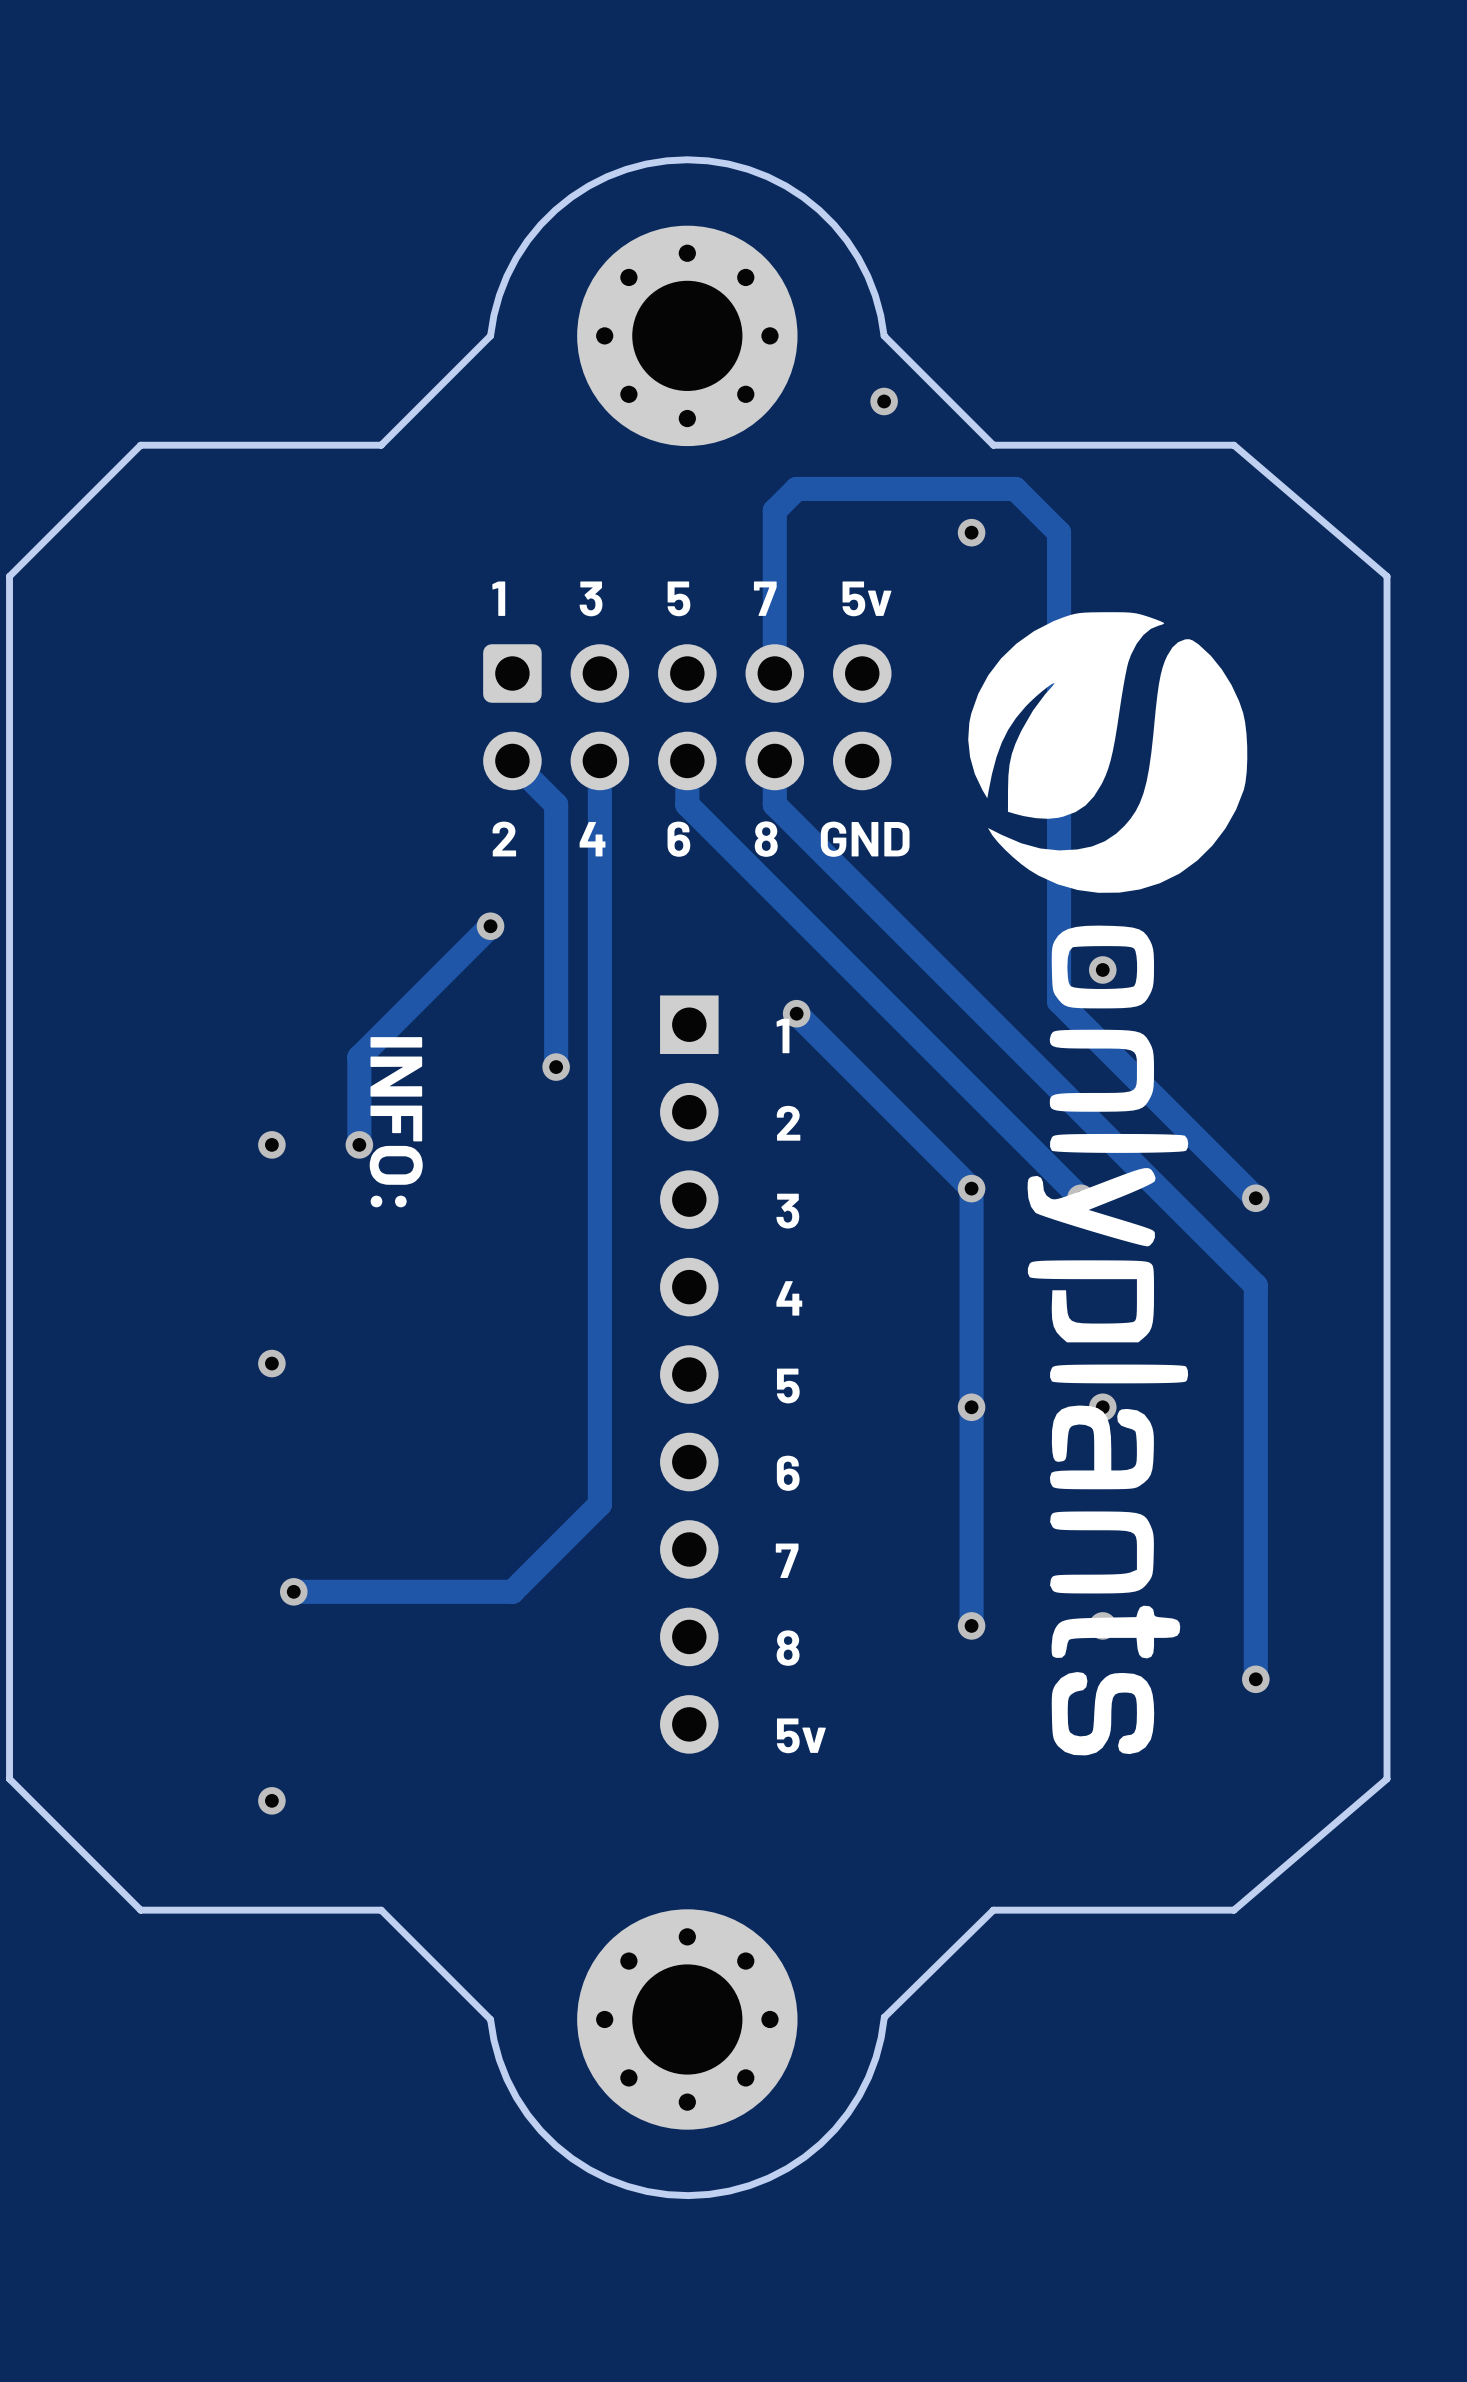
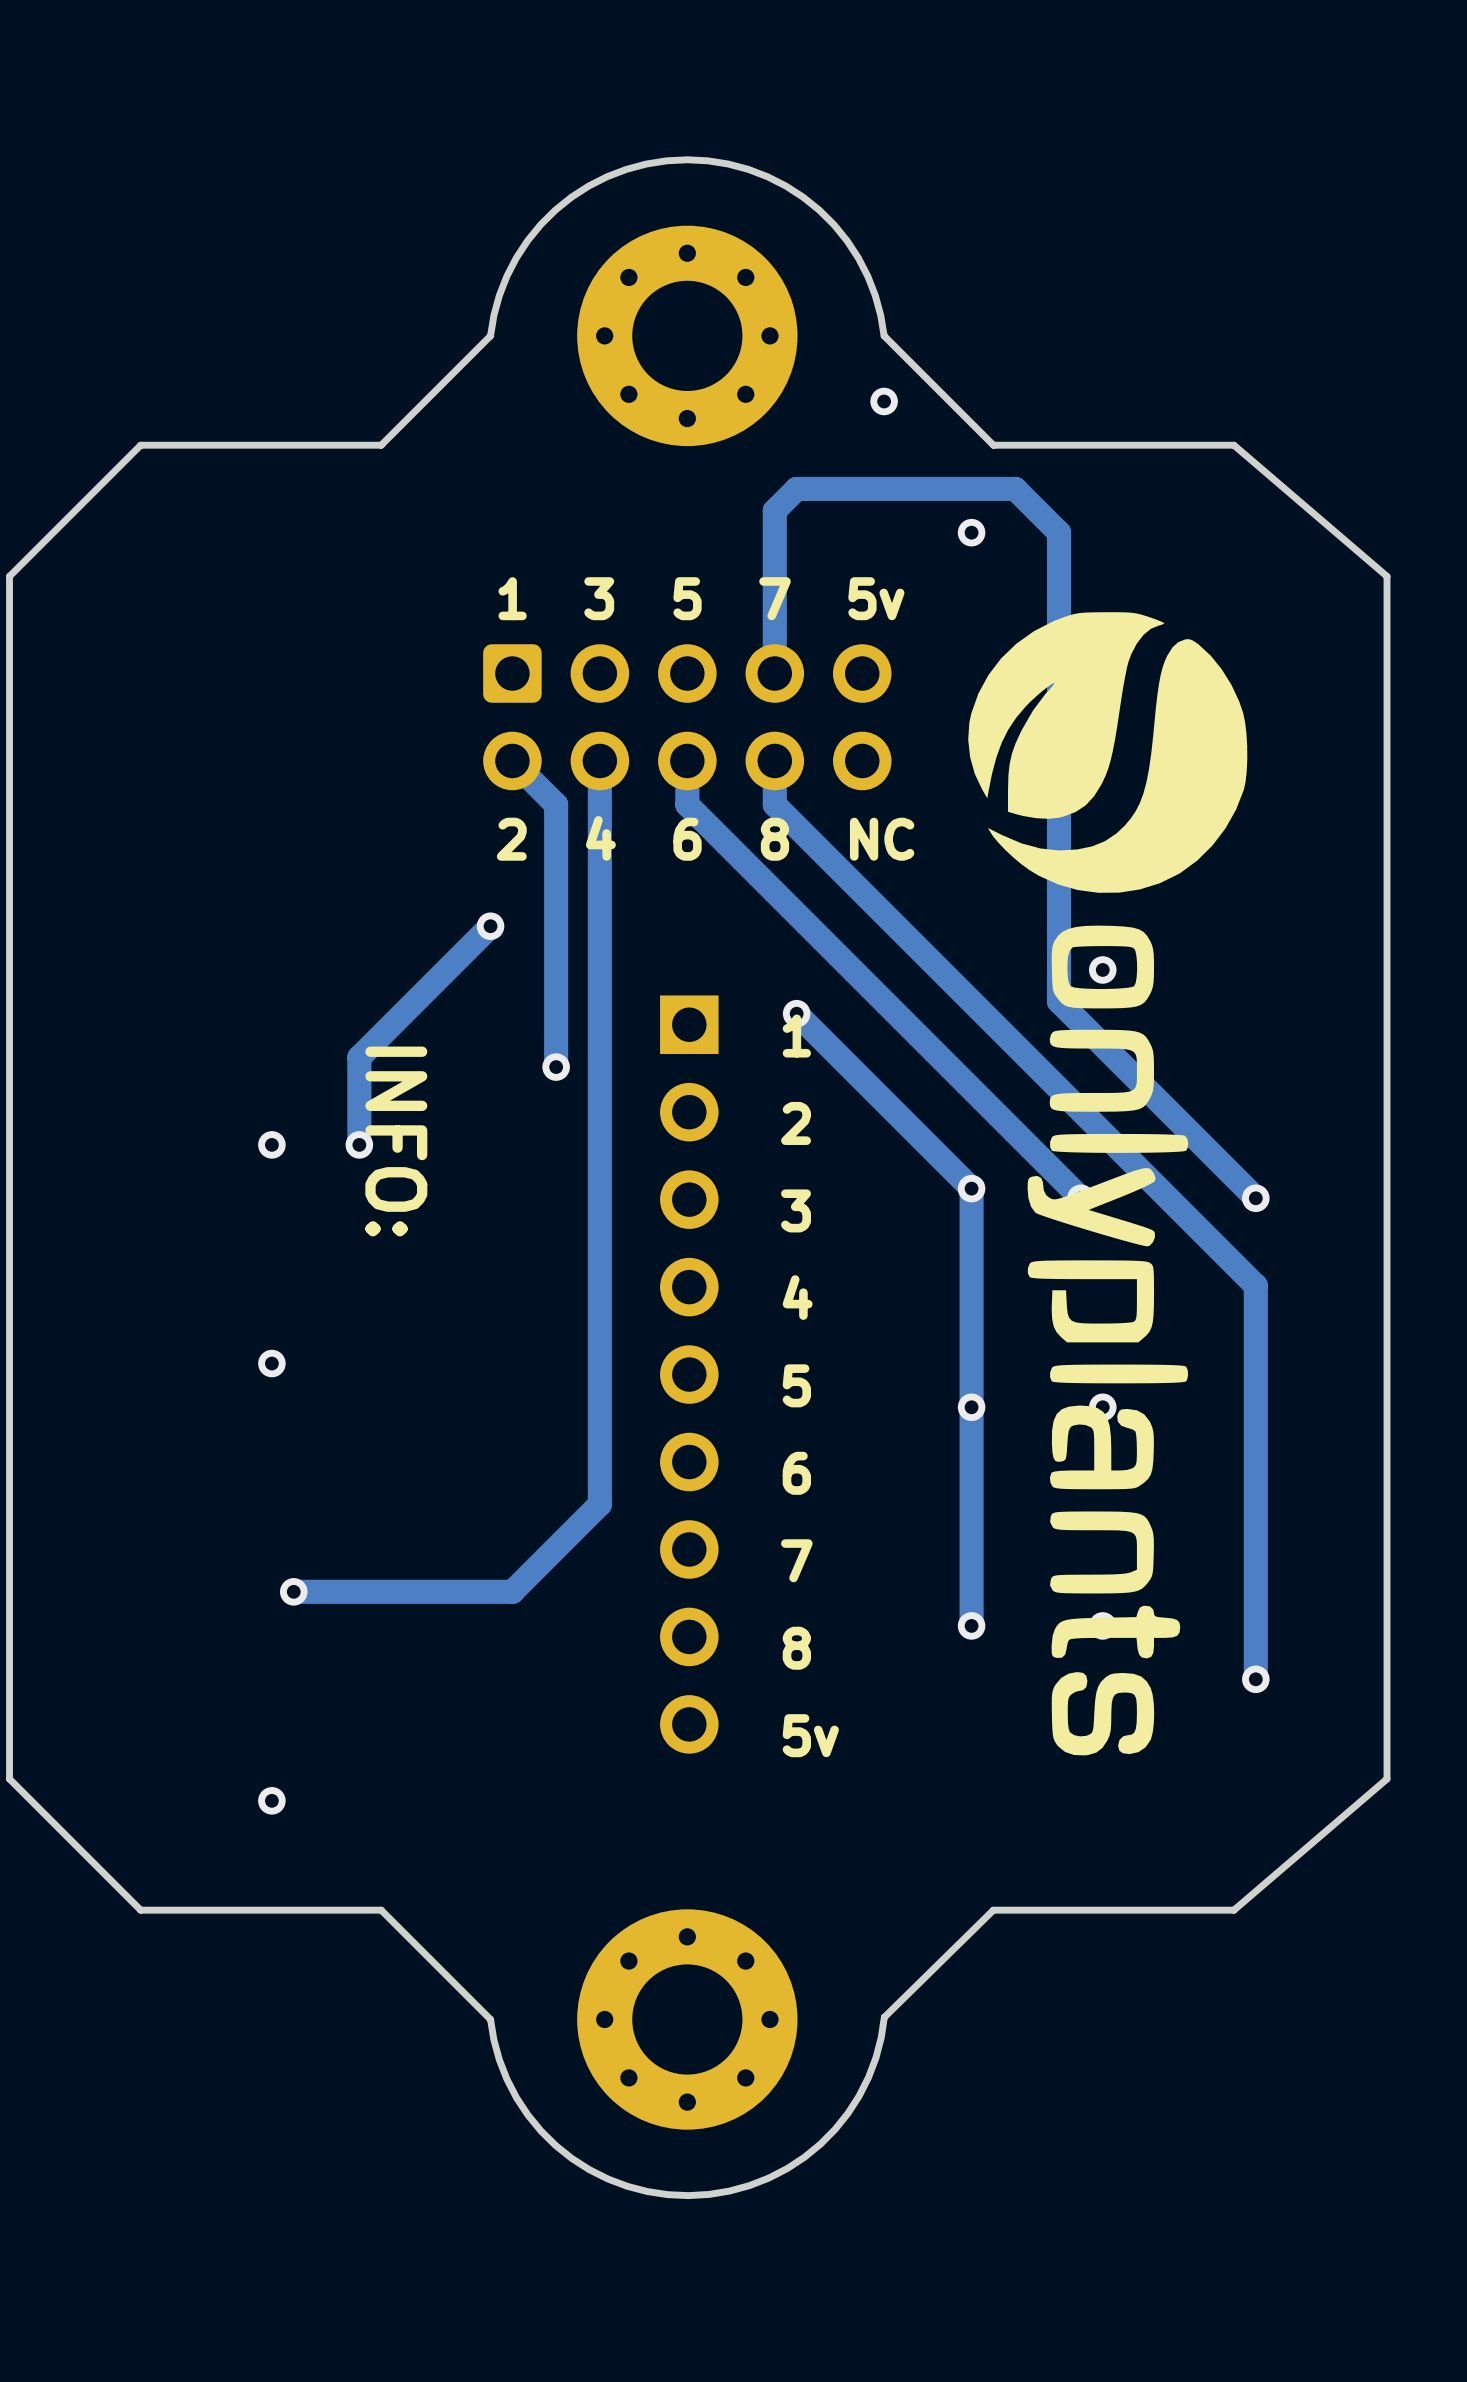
text: GND (865, 839) -> NC (882, 839)

